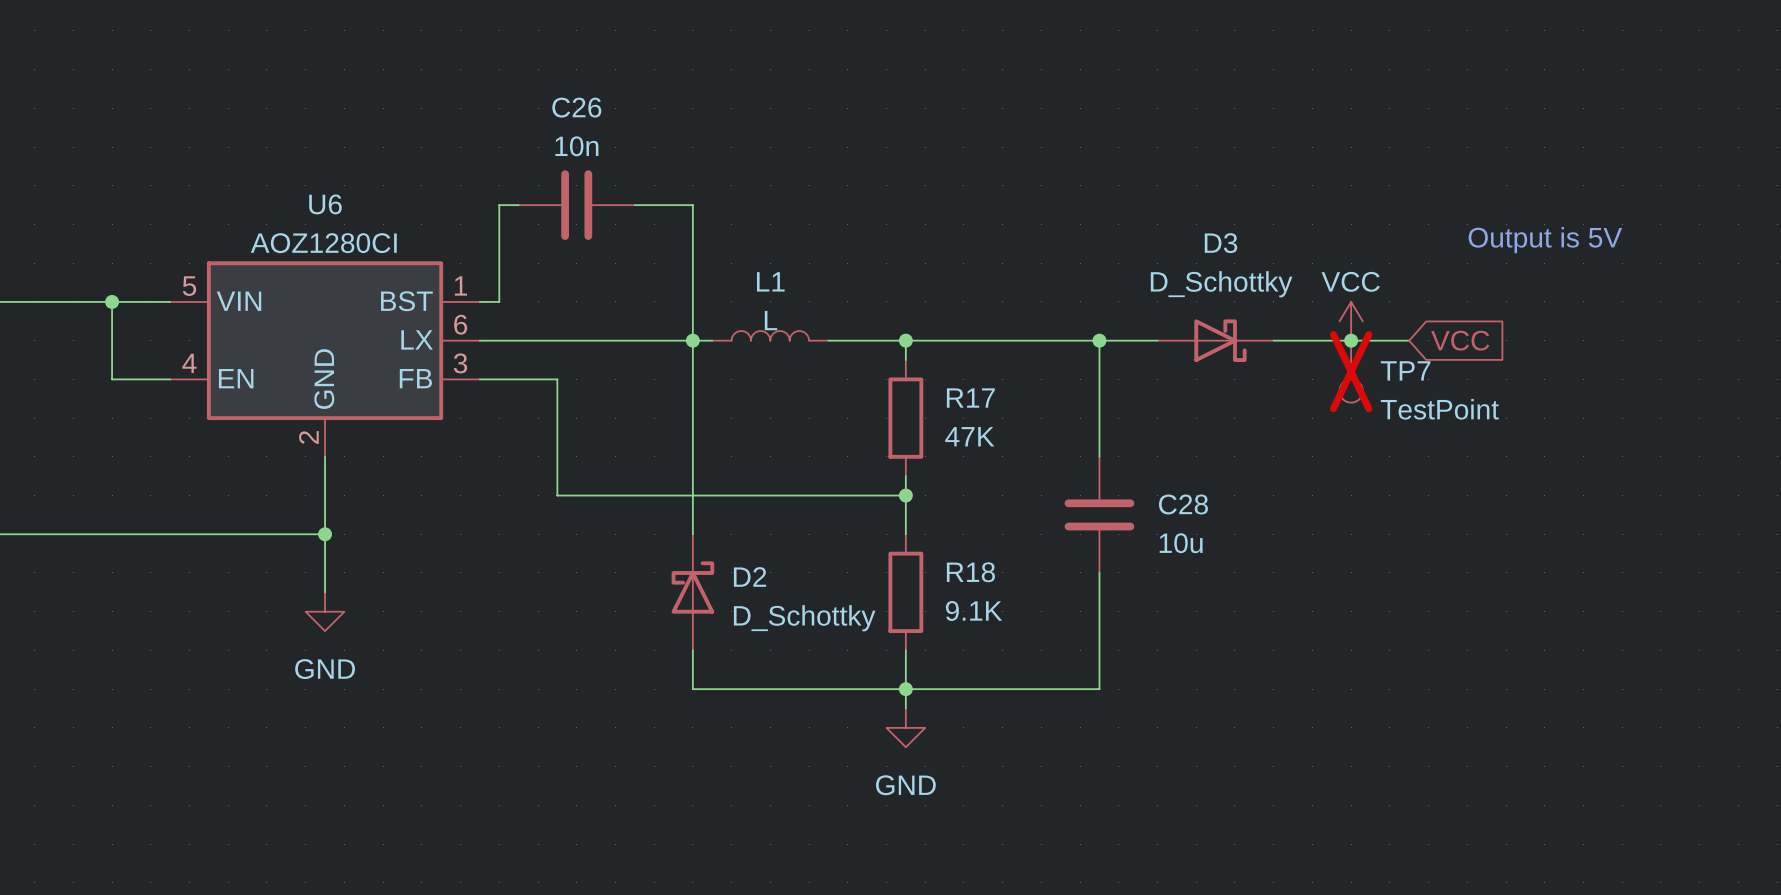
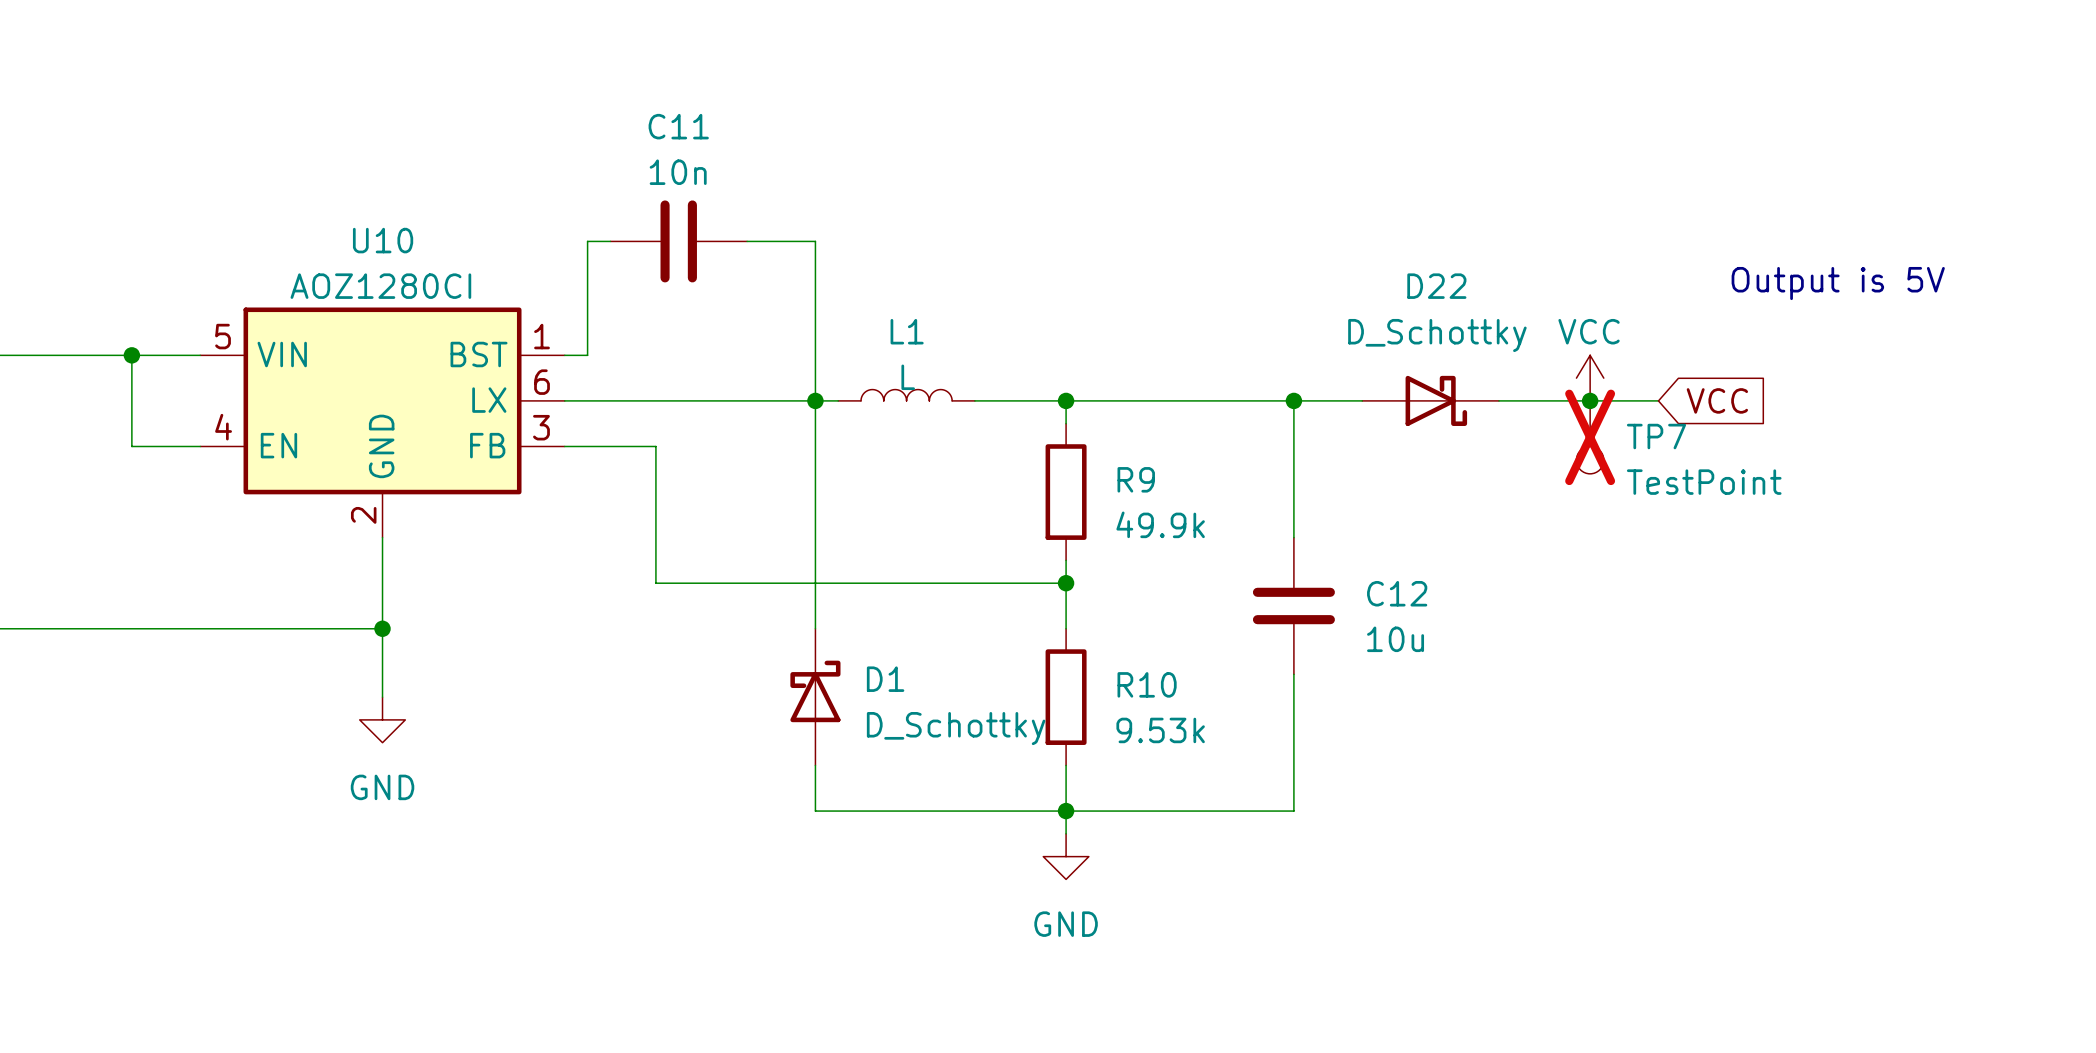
C26 name: C26 (576, 107) -> C11 (678, 126)
U6 name: U6 (325, 204) -> U10 (383, 240)
D3 name: D3 (1221, 243) -> D22 (1436, 286)
R17 name: R17 (970, 398) -> R9 (1136, 479)
R17 value: 47K (969, 436) -> 49.9k (1160, 524)
C28 name: C28 (1183, 504) -> C12 (1397, 593)
R18 name: R18 (970, 572) -> R10 (1147, 684)
D2 name: D2 (750, 576) -> D1 (885, 679)
R18 value: 9.1K (974, 610) -> 9.53k (1160, 730)

